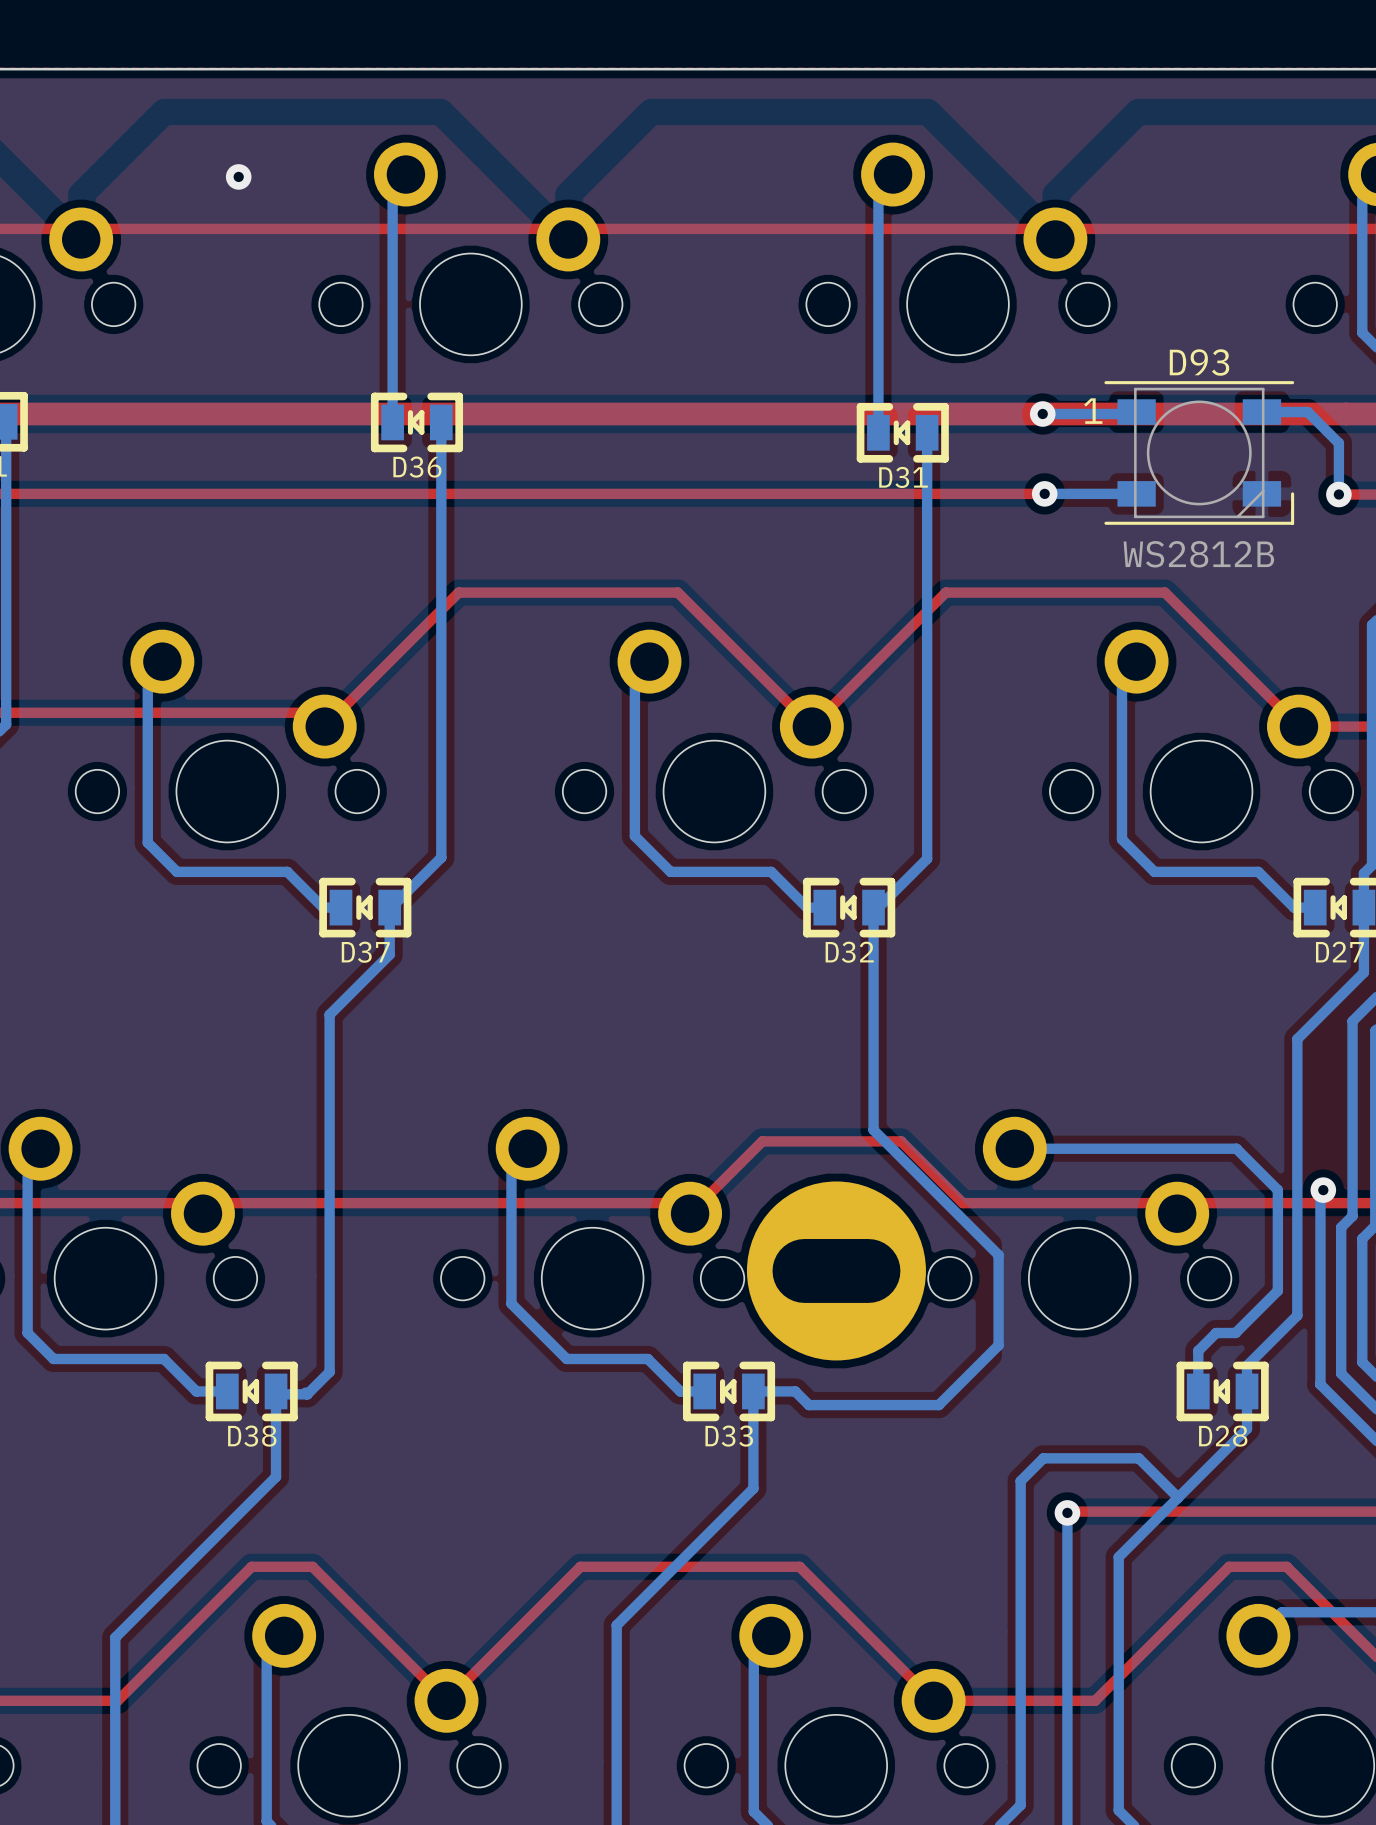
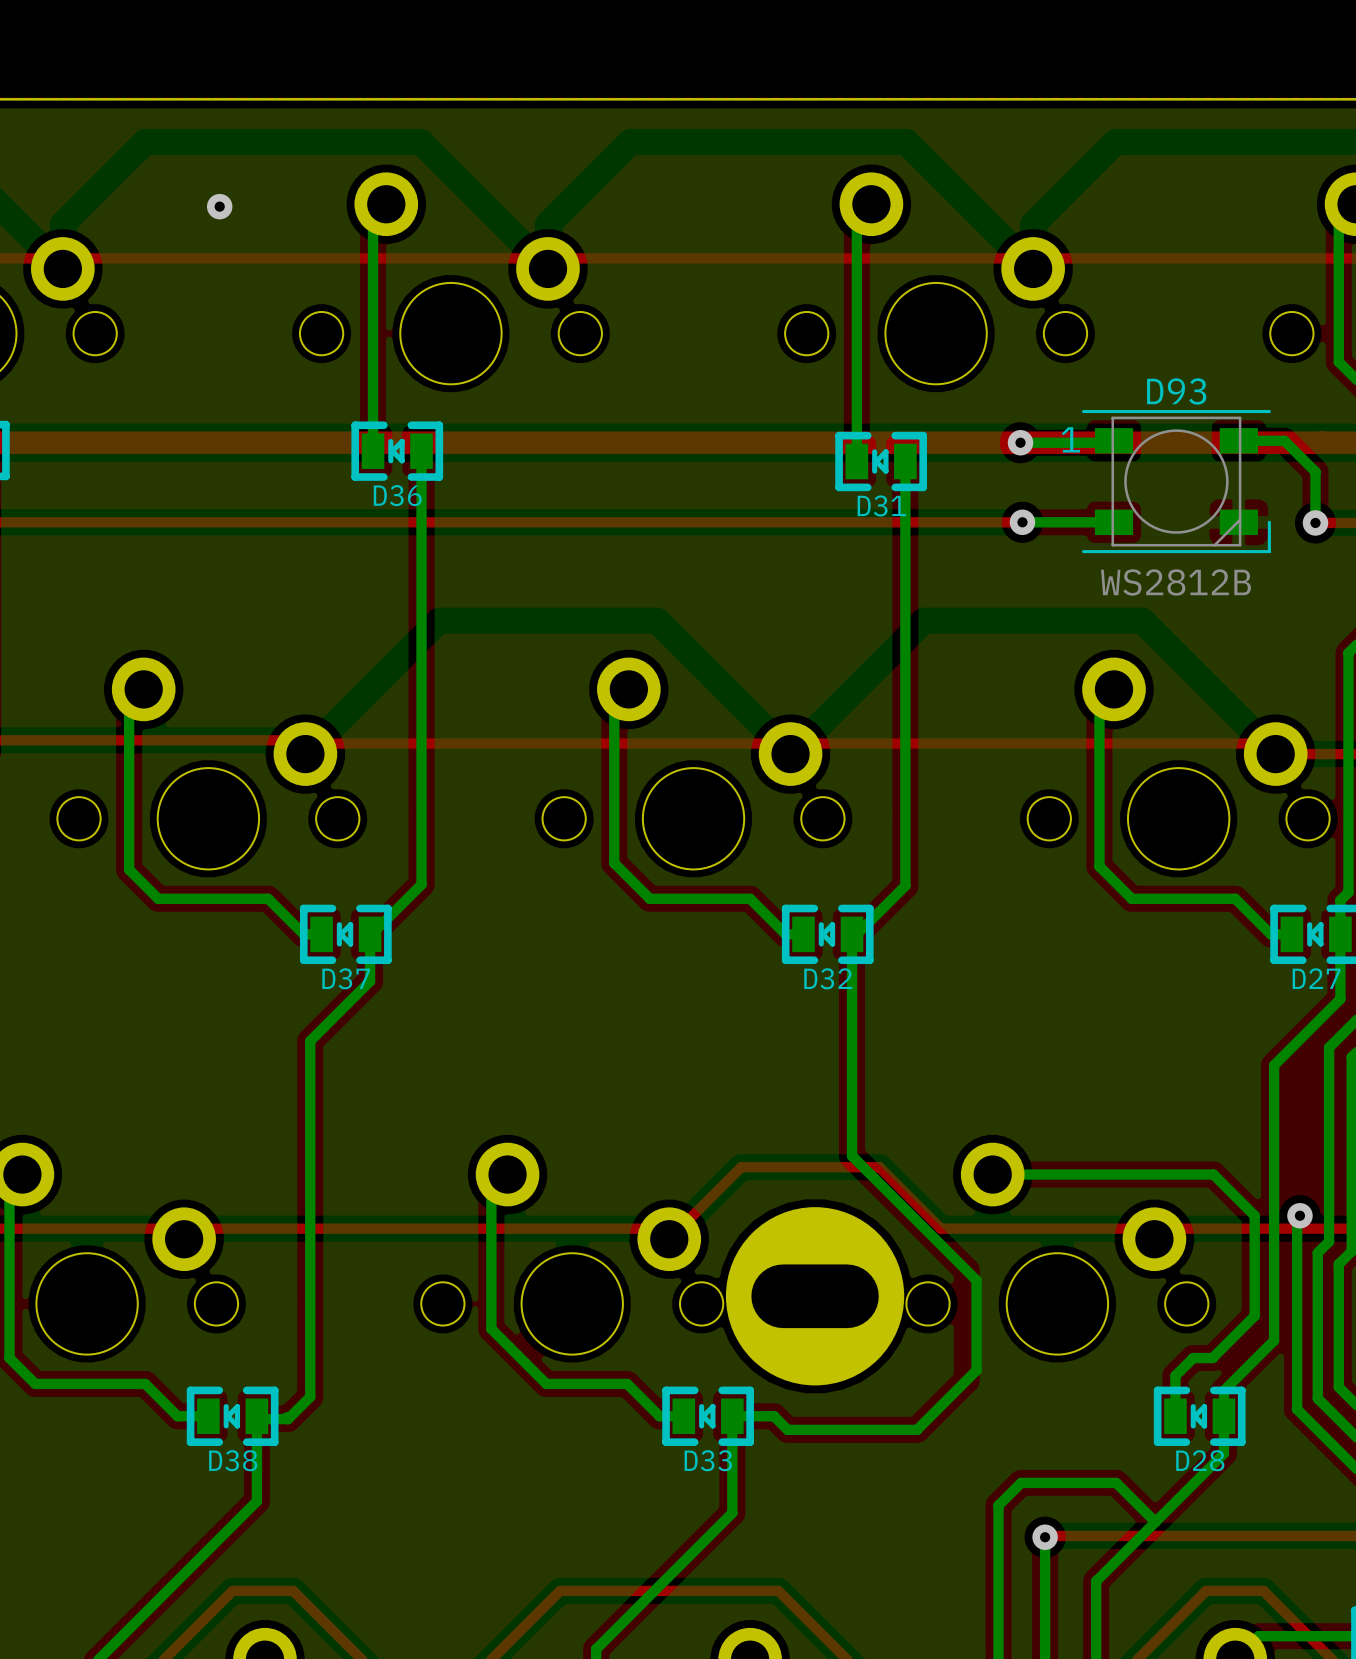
top track: (801, 716) (677, 592) (458, 592) (324, 726) -> (780, 743) (329, 743) (319, 754) (305, 754)
top track: (1288, 716) (1164, 592) (945, 592) (811, 726) -> (1265, 743) (808, 743) (797, 754) (790, 754)

